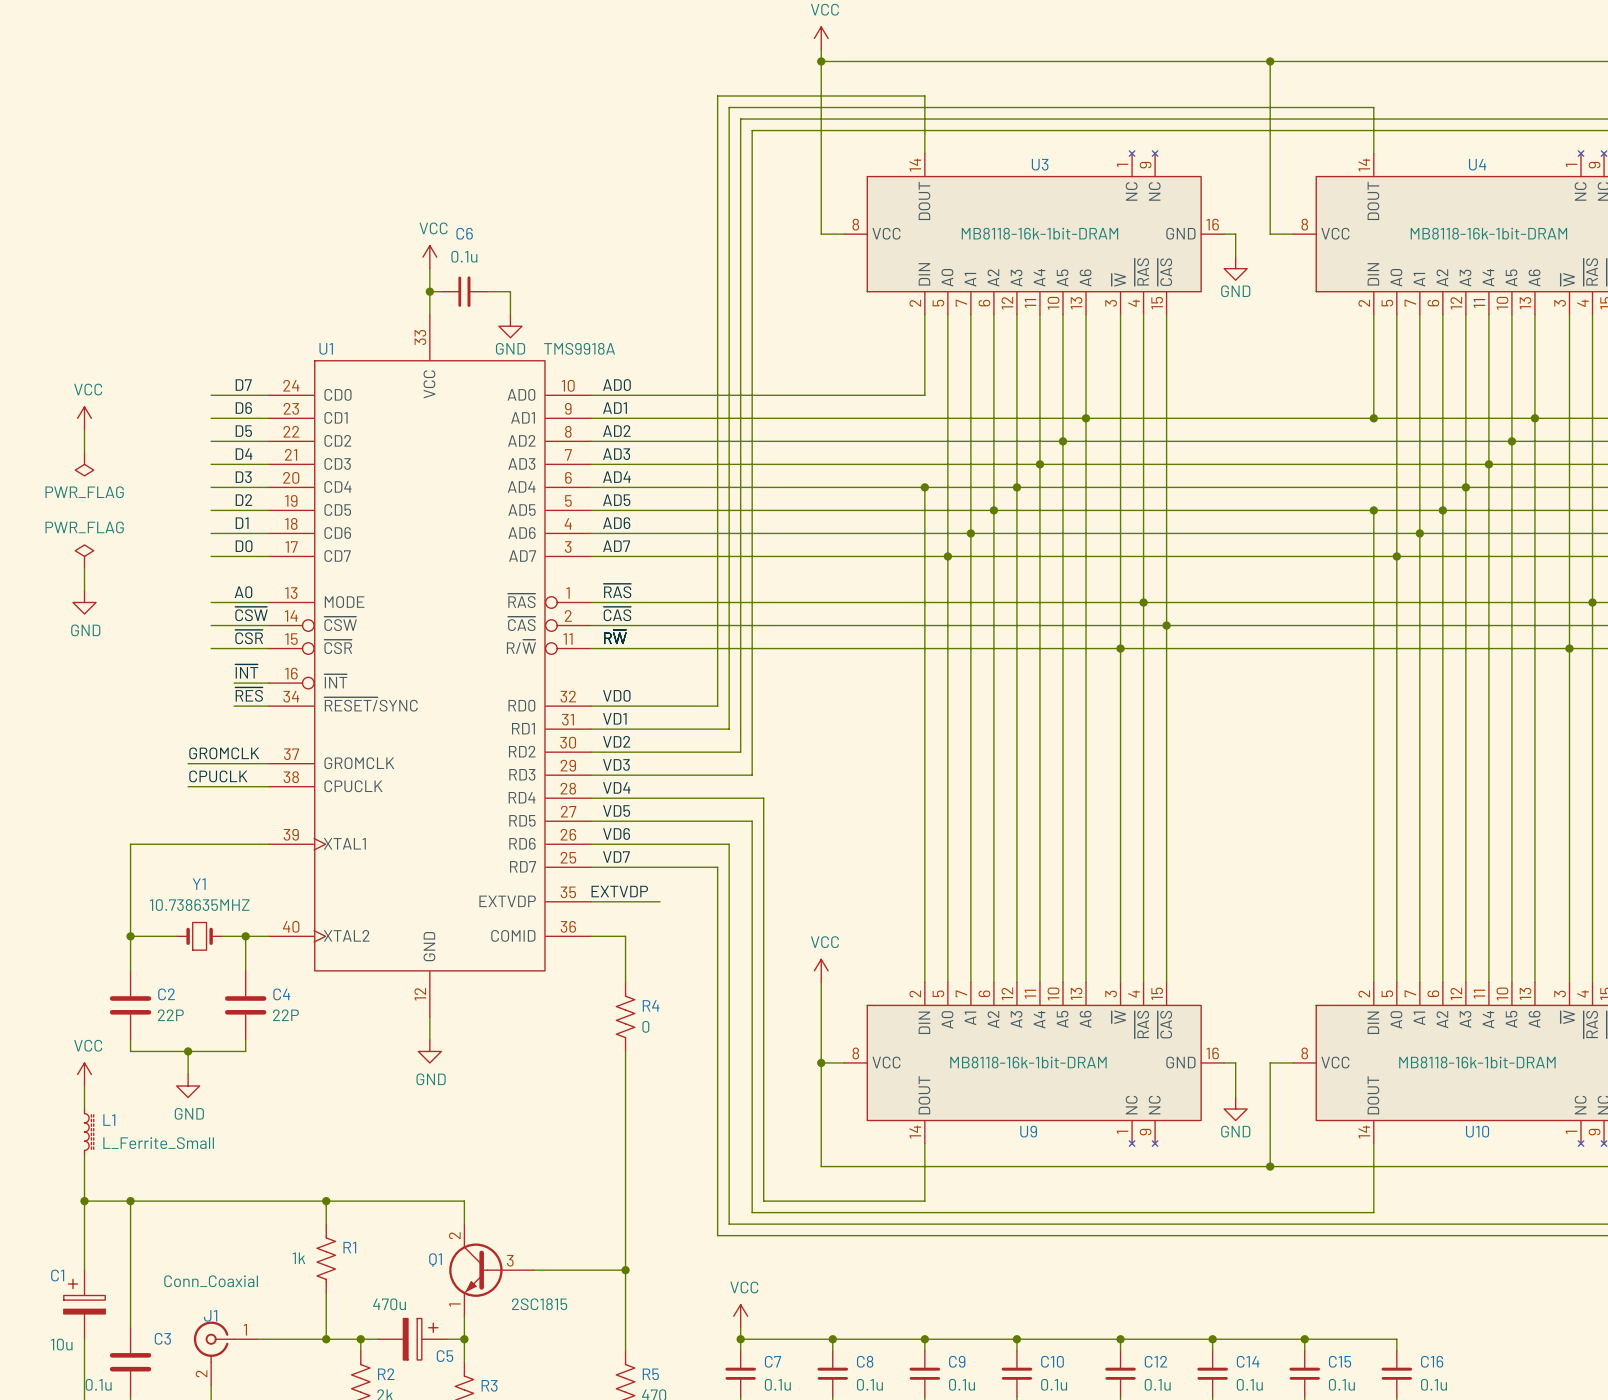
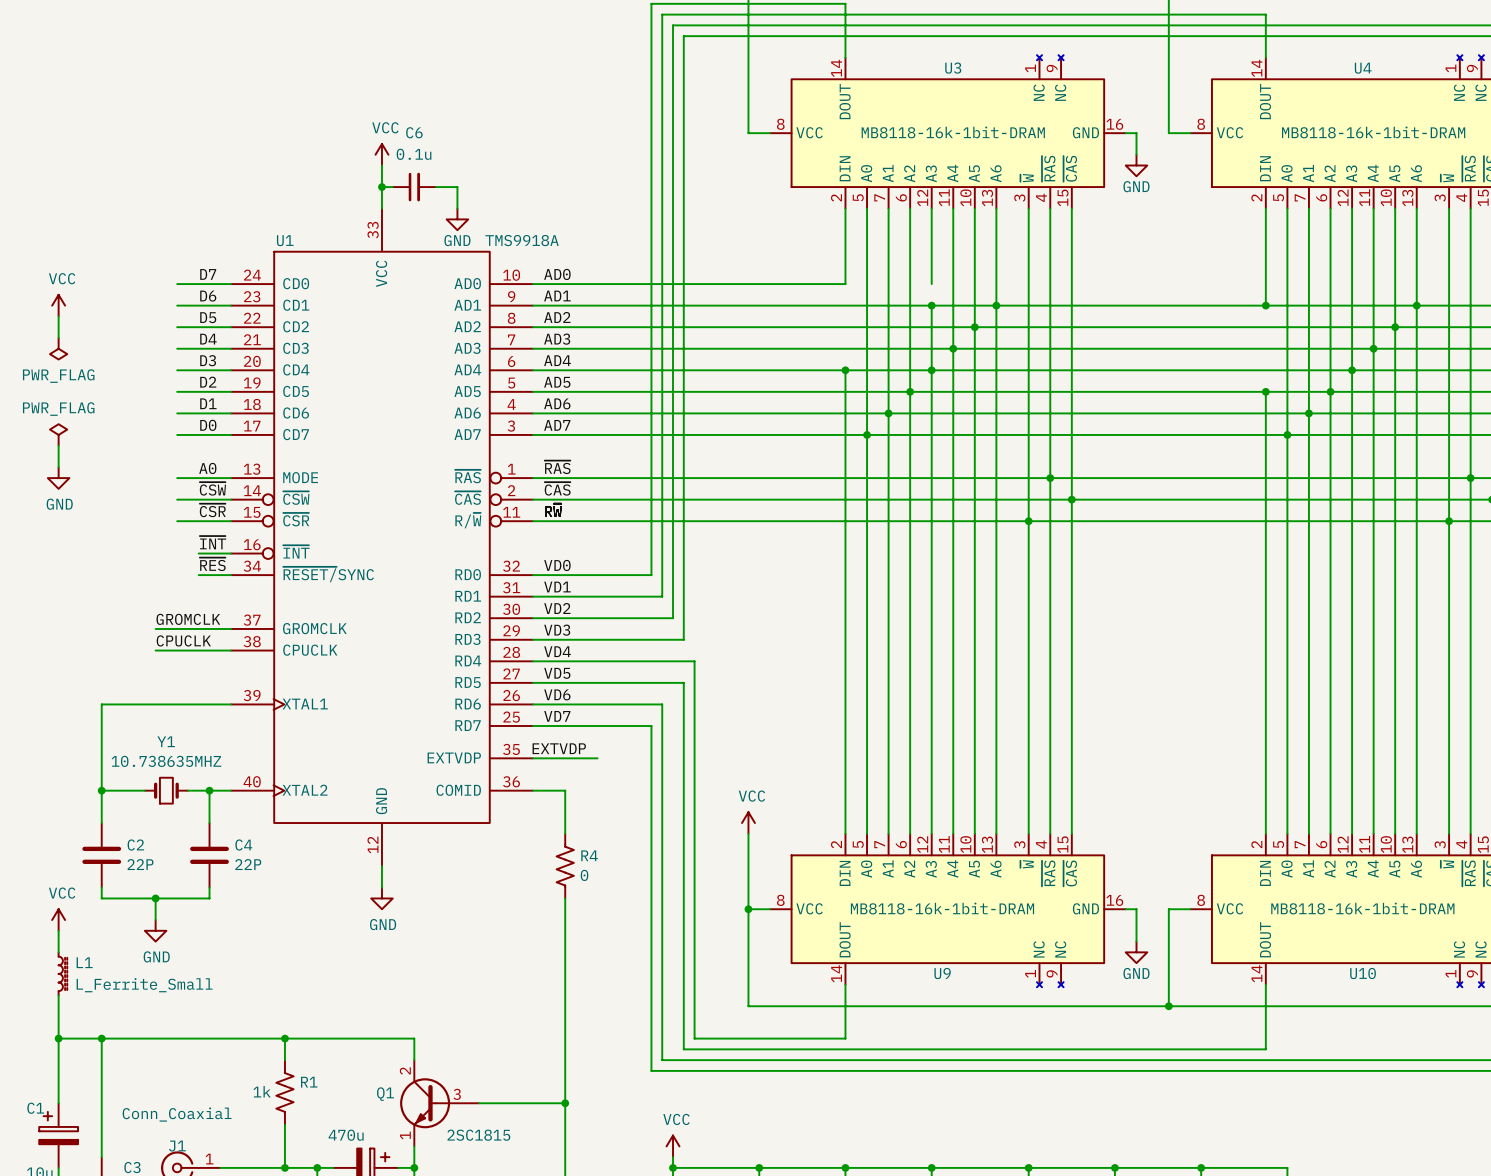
wire: (1016, 395) (1016, 418) -> none
junction: none -> (931, 305)

